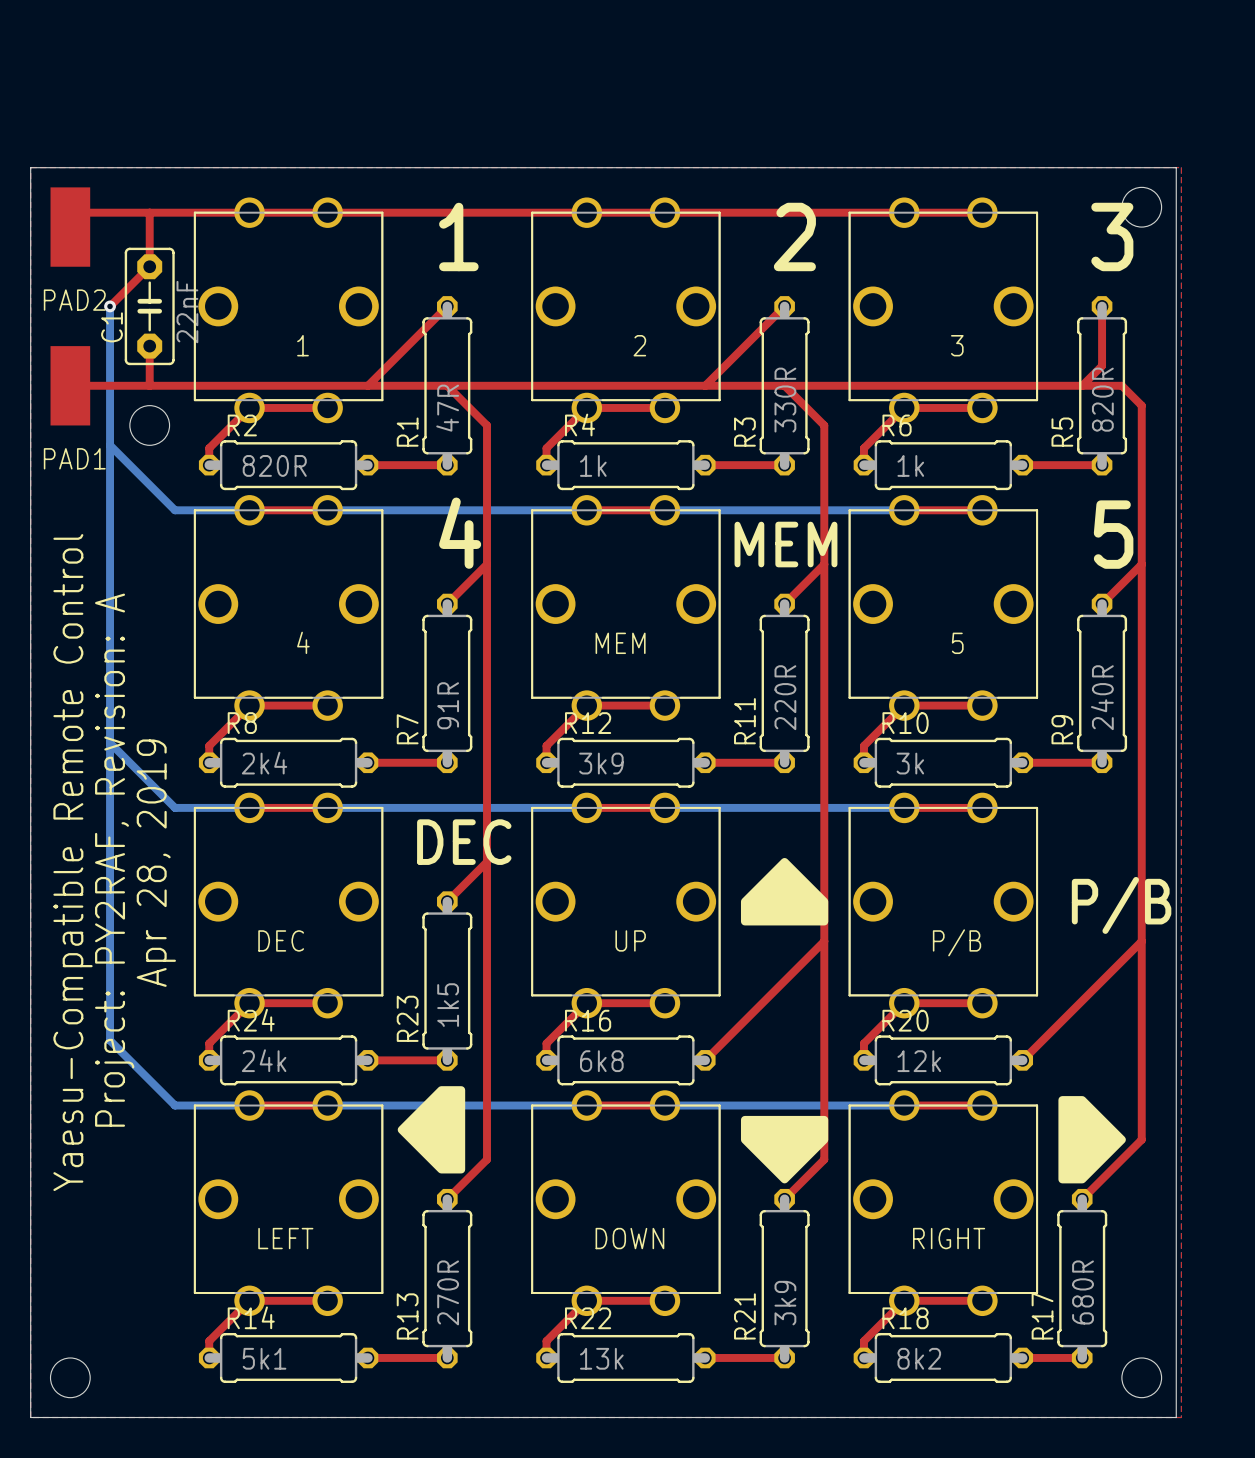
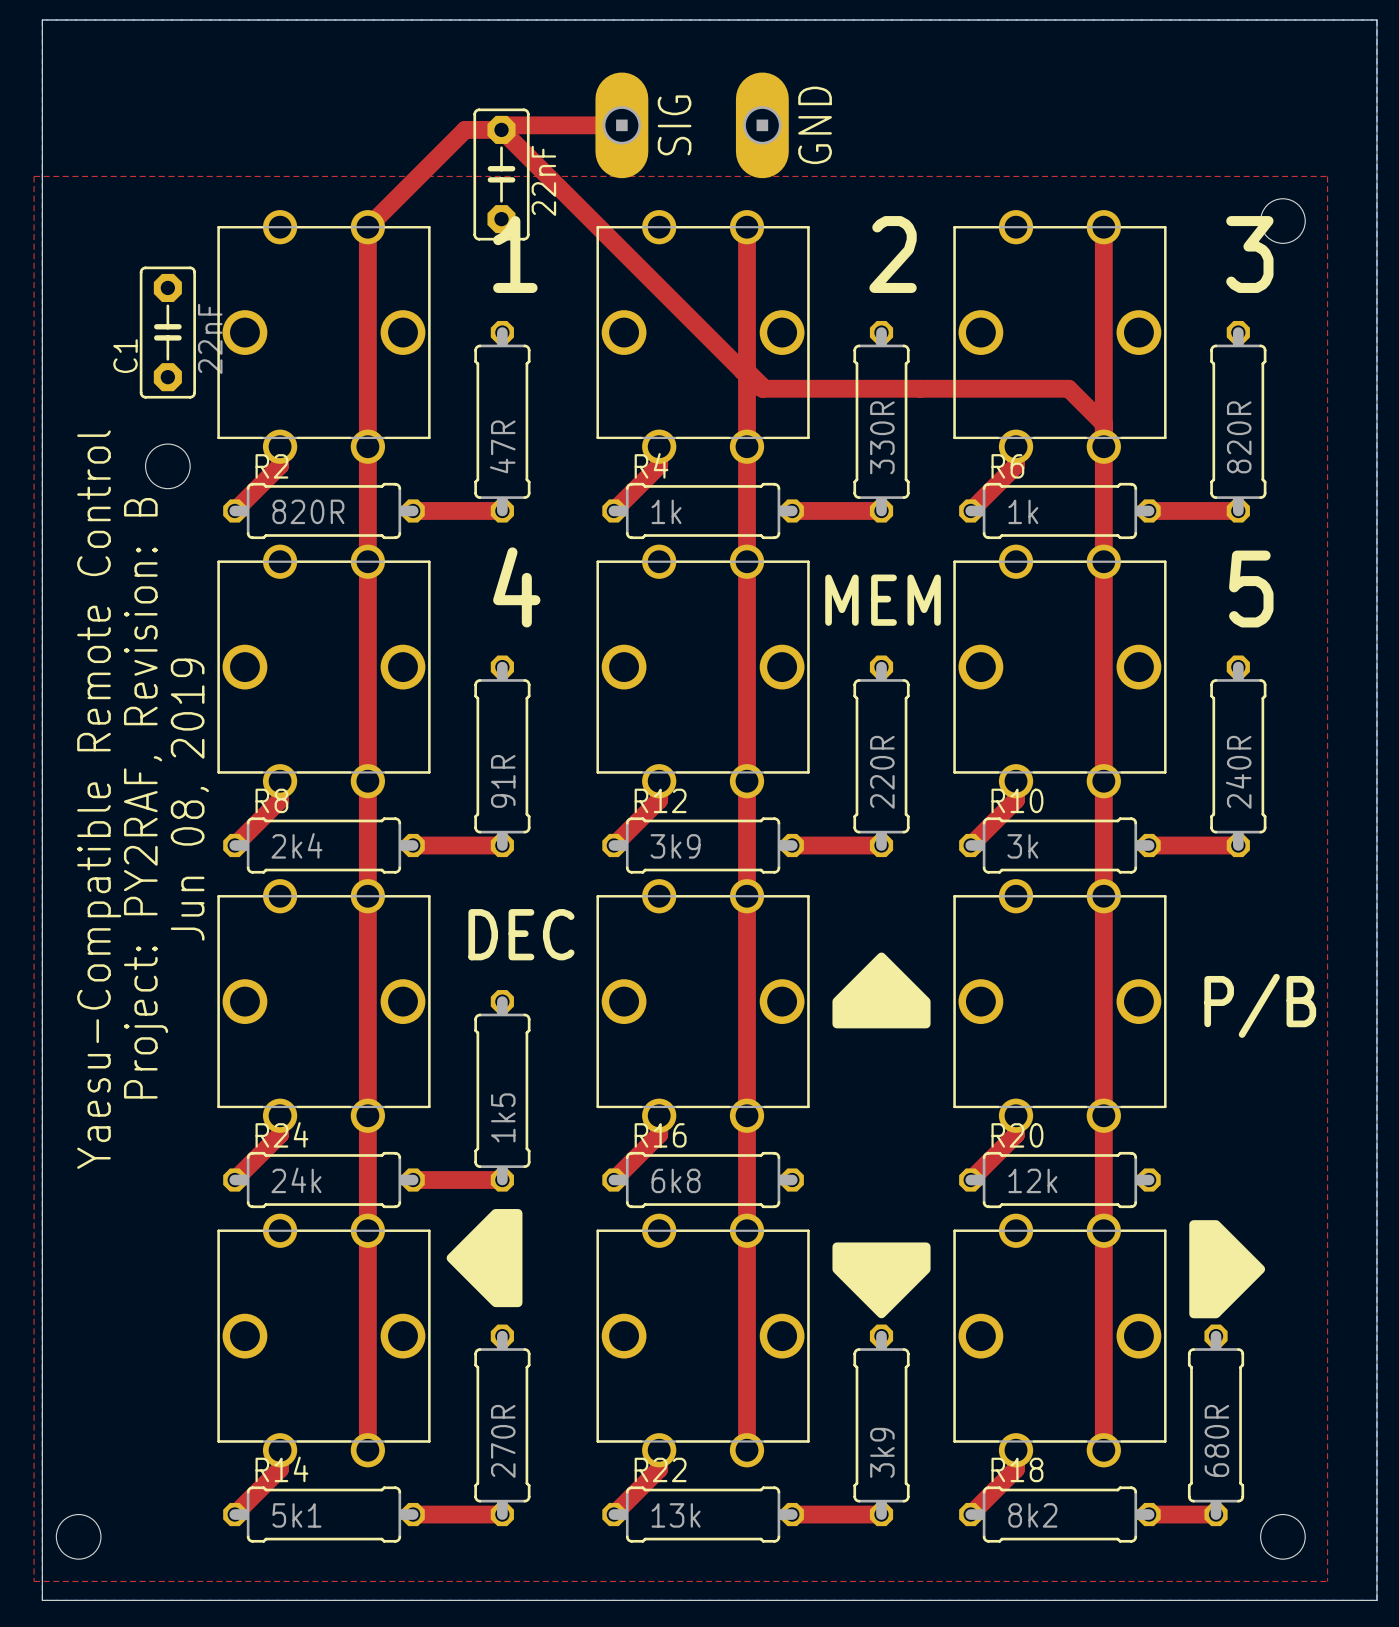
top track: none -> (621, 125) (506, 125) (501, 129)
part: none -> (621, 125)
text: none -> SIG (674, 125)
part: none -> (762, 125)
text: none -> GND (815, 125)
top track: none -> (501, 129) (465, 129) (367, 227) (367, 1450)
top track: none -> (501, 129) (742, 371) (747, 371) (762, 388) (1068, 388) (1103, 423)
part: none -> 22nF (501, 174)
board edge: (30, 167) (1176, 167) (1176, 1417) (30, 1417) (30, 167) -> (42, 19) (42, 1600) (1376, 1600) (1376, 19) (42, 19)
top track: (149, 212) (149, 266) (110, 306) -> none
top track: none -> (747, 227) (747, 1450)
top track: (982, 212) (84, 212) (70, 227) -> (1103, 227) (1103, 1450)
PAD2: (70, 227) -> none
bottom track: (110, 306) (110, 1040) (175, 1105) (249, 1105) -> none
via: (110, 306) -> none
top track: (447, 306) (367, 385) -> none
top track: (784, 306) (705, 385) -> none
top track: (1102, 306) (1102, 365) (1082, 385) -> none
1 name: 1 (302, 345) -> none
2 name: 2 (639, 345) -> none
3 name: 3 (957, 345) -> none
top track: (149, 346) (149, 385) -> none
top track: (70, 385) (1121, 385) (1141, 405) (1141, 1139) (1082, 1199) -> none
PAD1: (70, 385) -> none
top track: (447, 385) (487, 425) (487, 1159) (447, 1199) -> none
top track: (784, 385) (824, 425) (824, 1159) (784, 1199) -> none
top track: (327, 407) (249, 407) (209, 448) (209, 465) -> (280, 446) (280, 465) (234, 510)
top track: (664, 407) (586, 407) (546, 448) (546, 465) -> (659, 446) (659, 465) (613, 510)
top track: (982, 407) (904, 407) (863, 448) (863, 465) -> (1016, 446) (1016, 465) (970, 510)
R1 name: R1 (407, 432) -> none
R3 name: R3 (744, 432) -> none
R5 name: R5 (1062, 432) -> none
bottom track: (110, 445) (175, 510) (249, 510) -> none
top track width: thin (367, 465) (447, 465) -> thick (413, 510) (502, 510)
top track width: thin (705, 465) (784, 465) -> thick (792, 510) (881, 510)
top track width: thin (1022, 465) (1102, 465) -> thick (1149, 510) (1238, 510)
top track: (249, 510) (327, 510) -> none
bottom track: (327, 510) (586, 510) -> none
top track: (586, 510) (664, 510) -> none
bottom track: (664, 510) (904, 510) -> none
top track: (904, 510) (982, 510) -> none
top track: (487, 564) (447, 604) -> none
top track: (824, 564) (784, 604) -> none
top track: (1141, 564) (1102, 604) -> none
4 name: 4 (303, 642) -> none
MEM name: MEM (620, 643) -> none
5 name: 5 (957, 643) -> none
top track: (327, 705) (249, 705) (209, 745) (209, 762) -> (280, 781) (280, 800) (234, 845)
top track: (664, 705) (586, 705) (546, 745) (546, 762) -> (659, 781) (659, 800) (613, 845)
top track: (982, 705) (904, 705) (863, 745) (863, 762) -> (1016, 781) (1016, 800) (970, 845)
R11 name: R11 (744, 721) -> none
R7 name: R7 (407, 729) -> none
R9 name: R9 (1062, 729) -> none
bottom track: (110, 742) (175, 807) (249, 807) -> none
top track width: thin (367, 762) (447, 762) -> thick (413, 845) (502, 845)
top track width: thin (705, 762) (784, 762) -> thick (792, 845) (881, 845)
top track width: thin (1022, 762) (1102, 762) -> thick (1149, 845) (1238, 845)
top track: (249, 807) (327, 807) -> none
bottom track: (327, 807) (586, 807) -> none
top track: (586, 807) (664, 807) -> none
bottom track: (664, 807) (904, 807) -> none
top track: (904, 807) (982, 807) -> none
text: Project: PY2RAF, Revision: A (114, 860) -> Project: PY2RAF, Revision: B (146, 798)
top track: (487, 861) (447, 901) -> none
text position: Yaesu-Compatible Remote Control (72, 862) -> Yaesu-Compatible Remote Control (99, 799)
text: Apr 28, 2019 (156, 863) -> Jun 08, 2019 (189, 799)
DEC name: DEC (281, 940) -> none
UP name: UP (630, 940) -> none
top track: (824, 941) (705, 1060) -> none
top track: (1141, 941) (1022, 1060) -> none
P/B name: P/B (957, 942) -> none
top track: (327, 1003) (249, 1003) (209, 1043) (209, 1060) -> (280, 1115) (280, 1134) (234, 1180)
top track: (664, 1003) (586, 1003) (546, 1043) (546, 1060) -> (659, 1115) (659, 1134) (613, 1180)
top track: (982, 1003) (904, 1003) (863, 1043) (863, 1060) -> (1016, 1115) (1016, 1134) (970, 1180)
R23 name: R23 (407, 1018) -> none
top track width: thin (367, 1060) (447, 1060) -> thick (413, 1180) (502, 1180)
top track: (249, 1105) (327, 1105) -> none
bottom track: (327, 1105) (586, 1105) -> none
top track: (586, 1105) (664, 1105) -> none
bottom track: (664, 1105) (904, 1105) -> none
top track: (904, 1105) (982, 1105) -> none
LEFT name: LEFT (285, 1238) -> none
DOWN name: DOWN (629, 1238) -> none
RIGHT name: RIGHT (949, 1238) -> none
top track: (327, 1300) (249, 1300) (209, 1341) (209, 1357) -> (280, 1450) (280, 1469) (234, 1514)
top track: (664, 1300) (586, 1300) (546, 1341) (546, 1357) -> (659, 1450) (659, 1469) (613, 1514)
top track: (982, 1300) (904, 1300) (863, 1341) (863, 1357) -> (1016, 1450) (1016, 1469) (970, 1514)
R13 name: R13 (407, 1316) -> none
R21 name: R21 (744, 1316) -> none
R17 name: R17 (1042, 1316) -> none
top track width: thin (367, 1357) (447, 1357) -> thick (413, 1514) (502, 1514)
top track width: thin (705, 1357) (784, 1357) -> thick (792, 1514) (881, 1514)
top track width: thin (1022, 1357) (1082, 1357) -> thick (1149, 1514) (1216, 1514)

